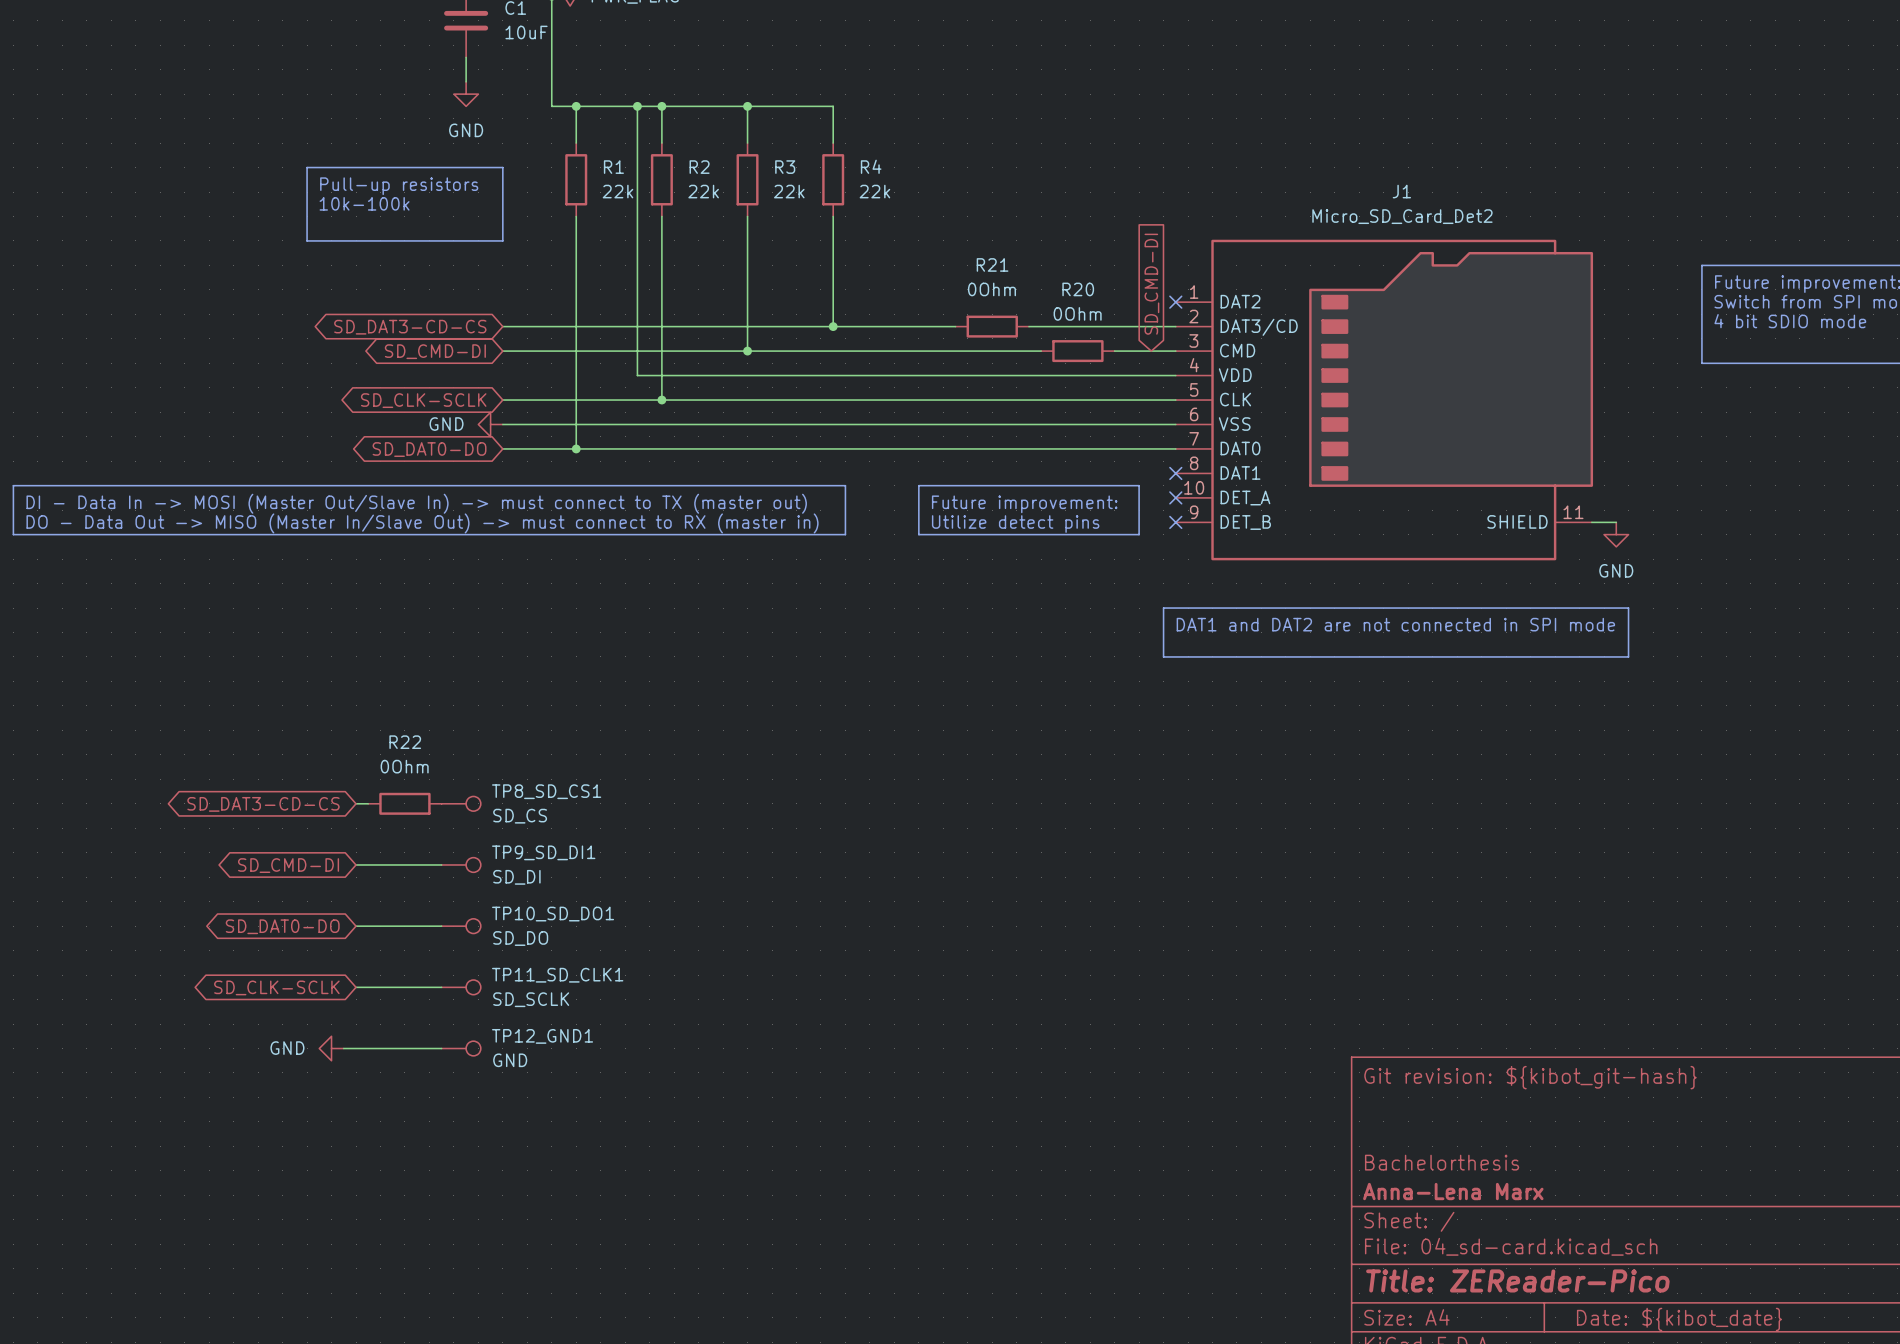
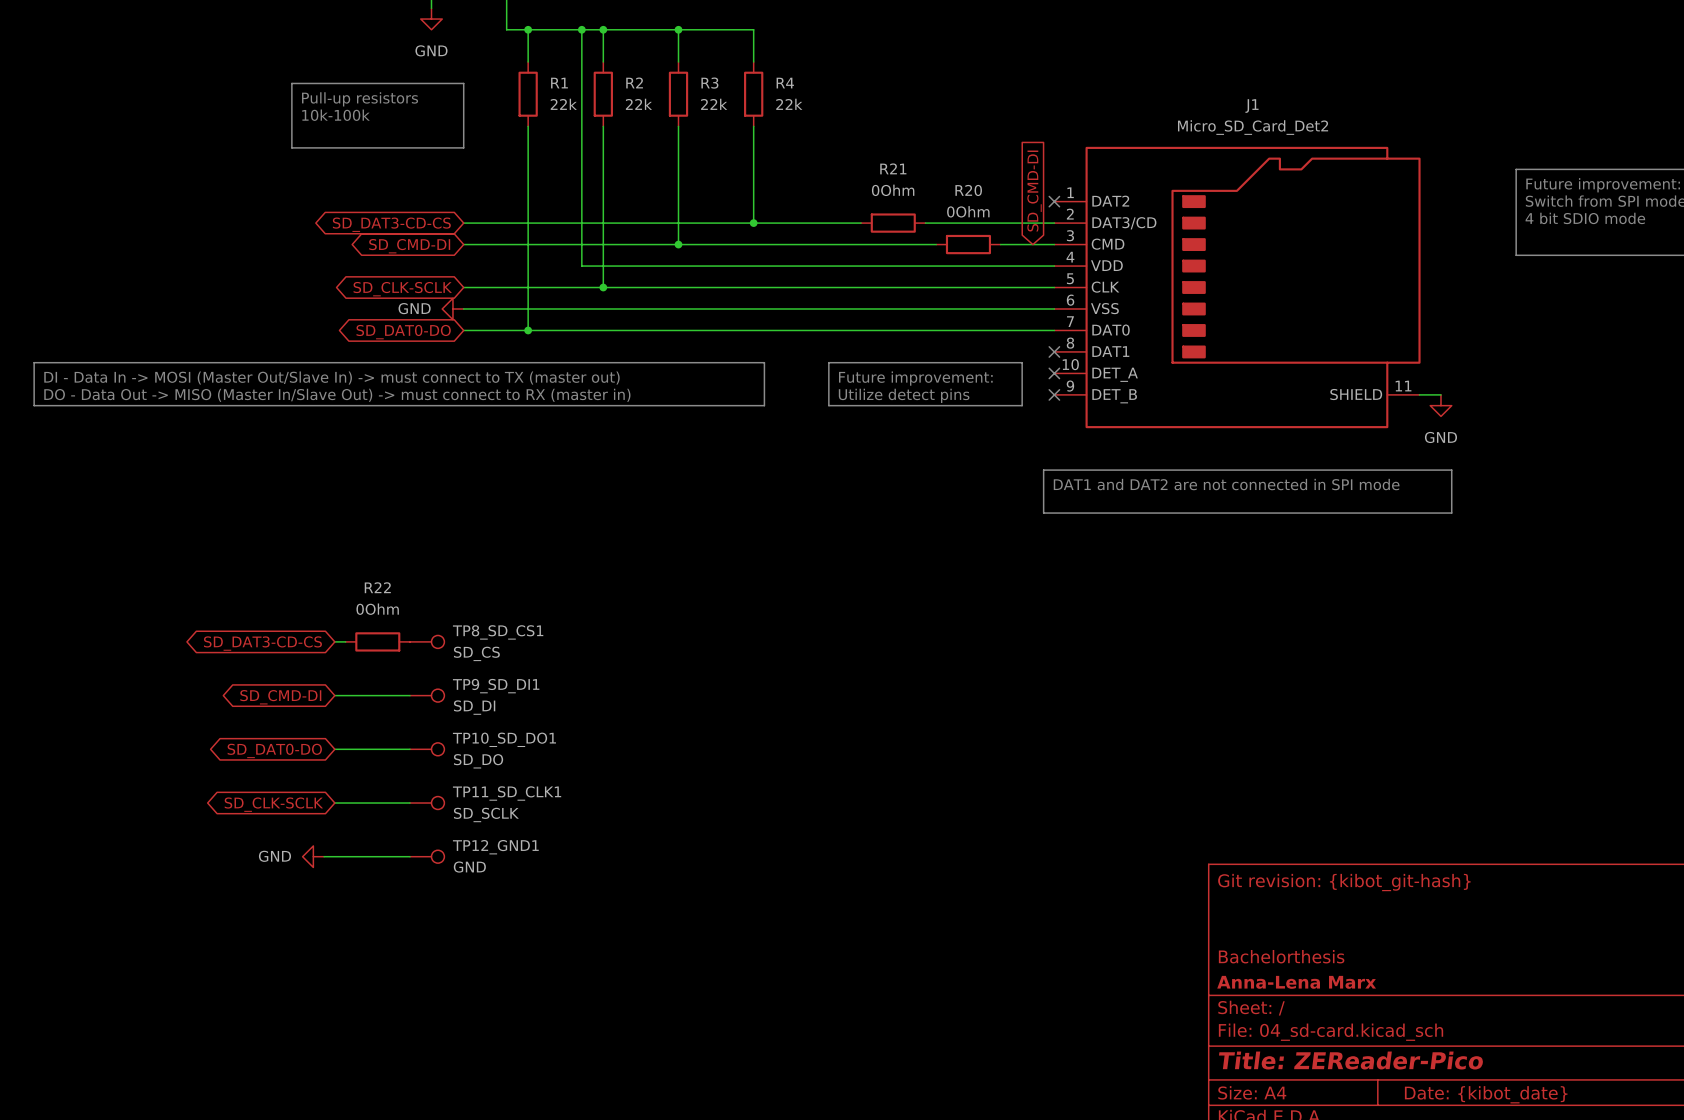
title block: Git revision: ${kibot_git-hash} (1530, 1077) -> Git revision: {kibot_git-hash} (1344, 882)
title block: Date: ${kibot_date} (1679, 1319) -> Date: {kibot_date} (1486, 1094)

